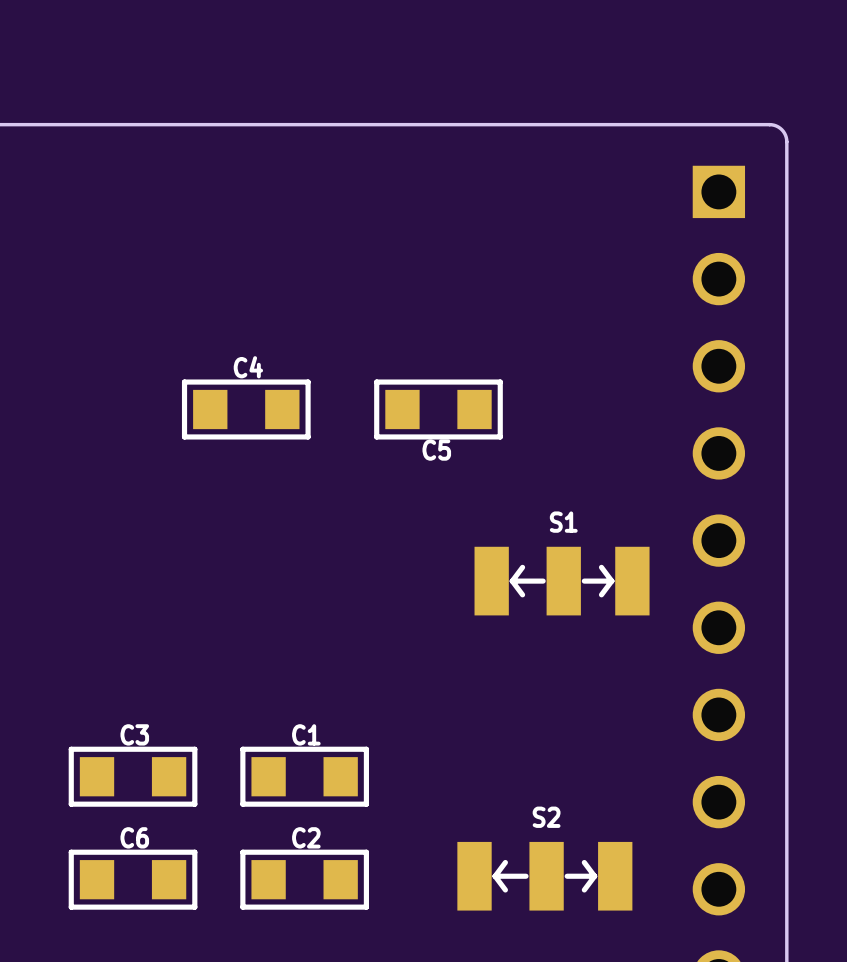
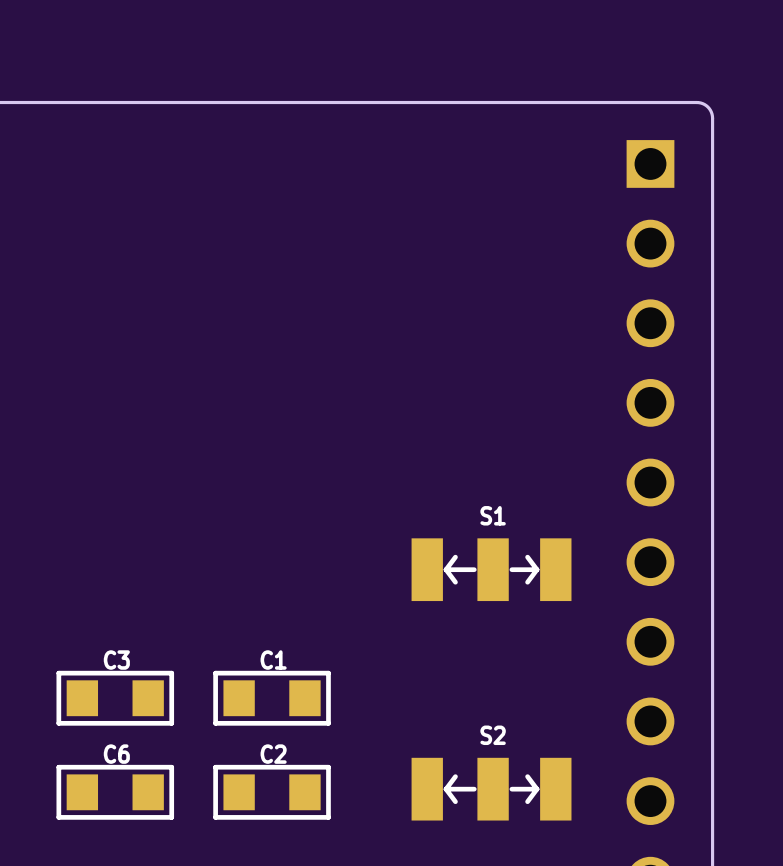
C4: (246, 409) -> none
C5: (438, 409) -> none
S1 position: (562, 581) -> (491, 569)

